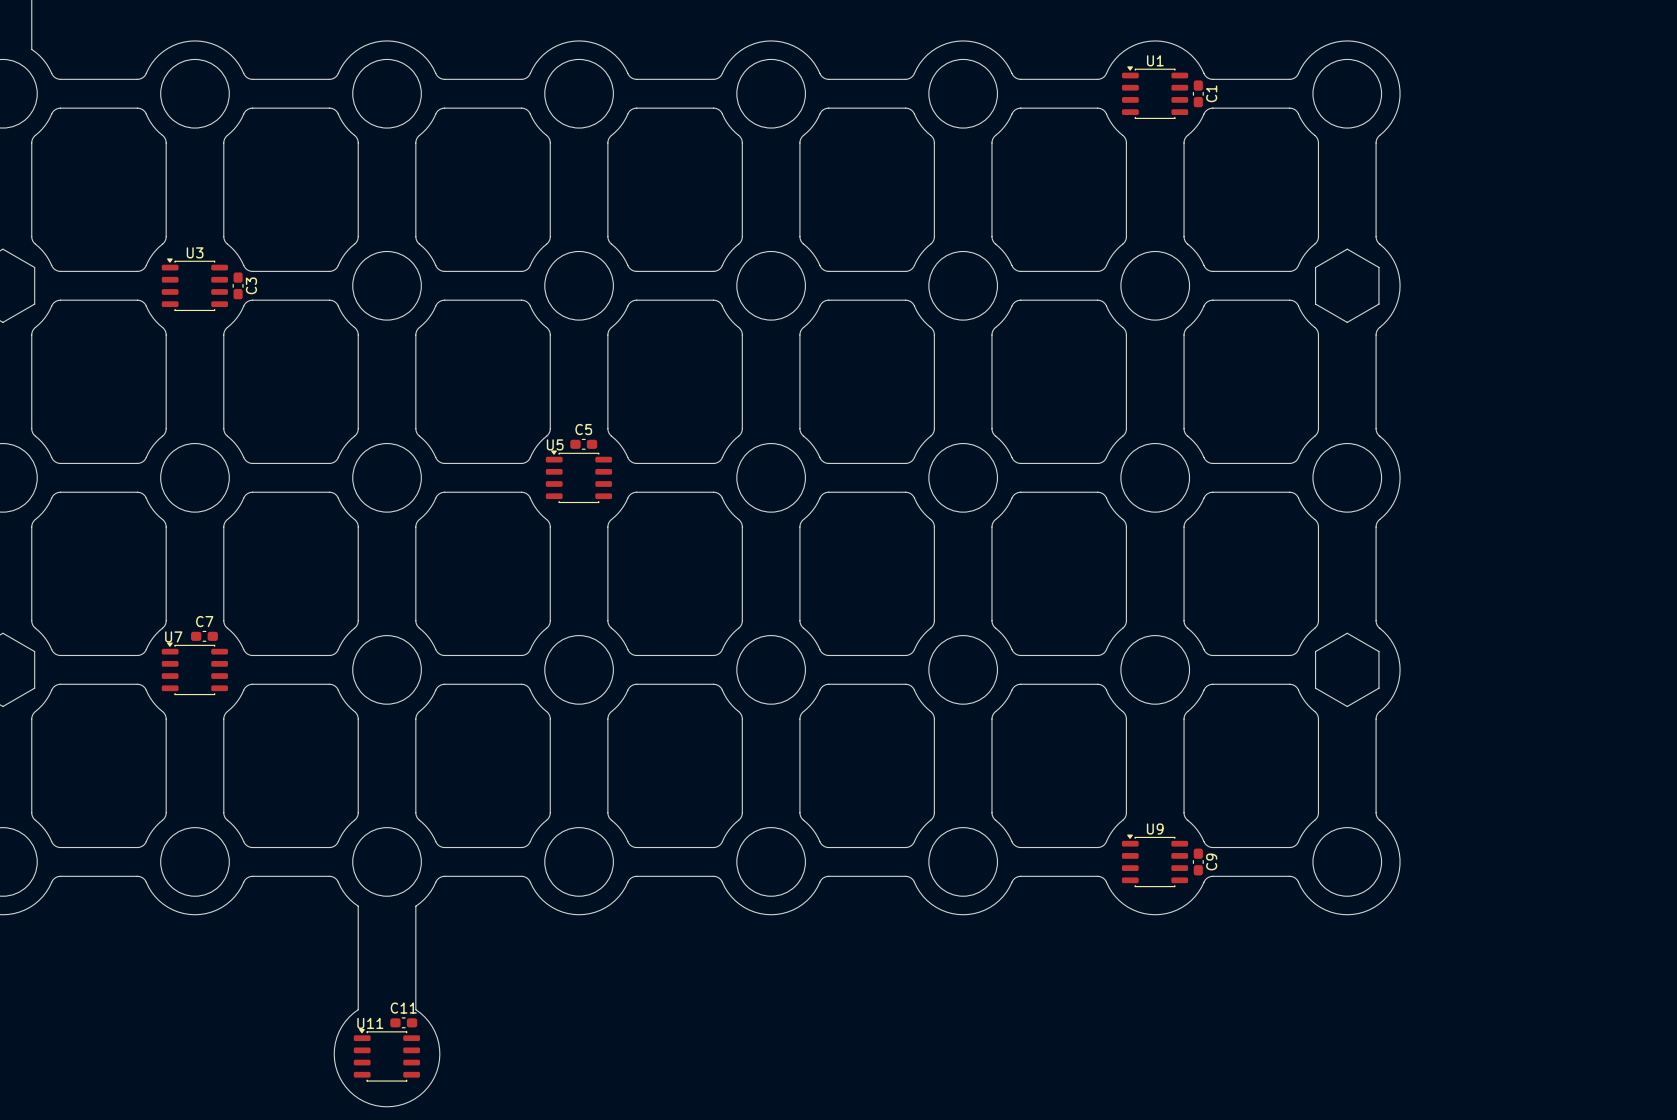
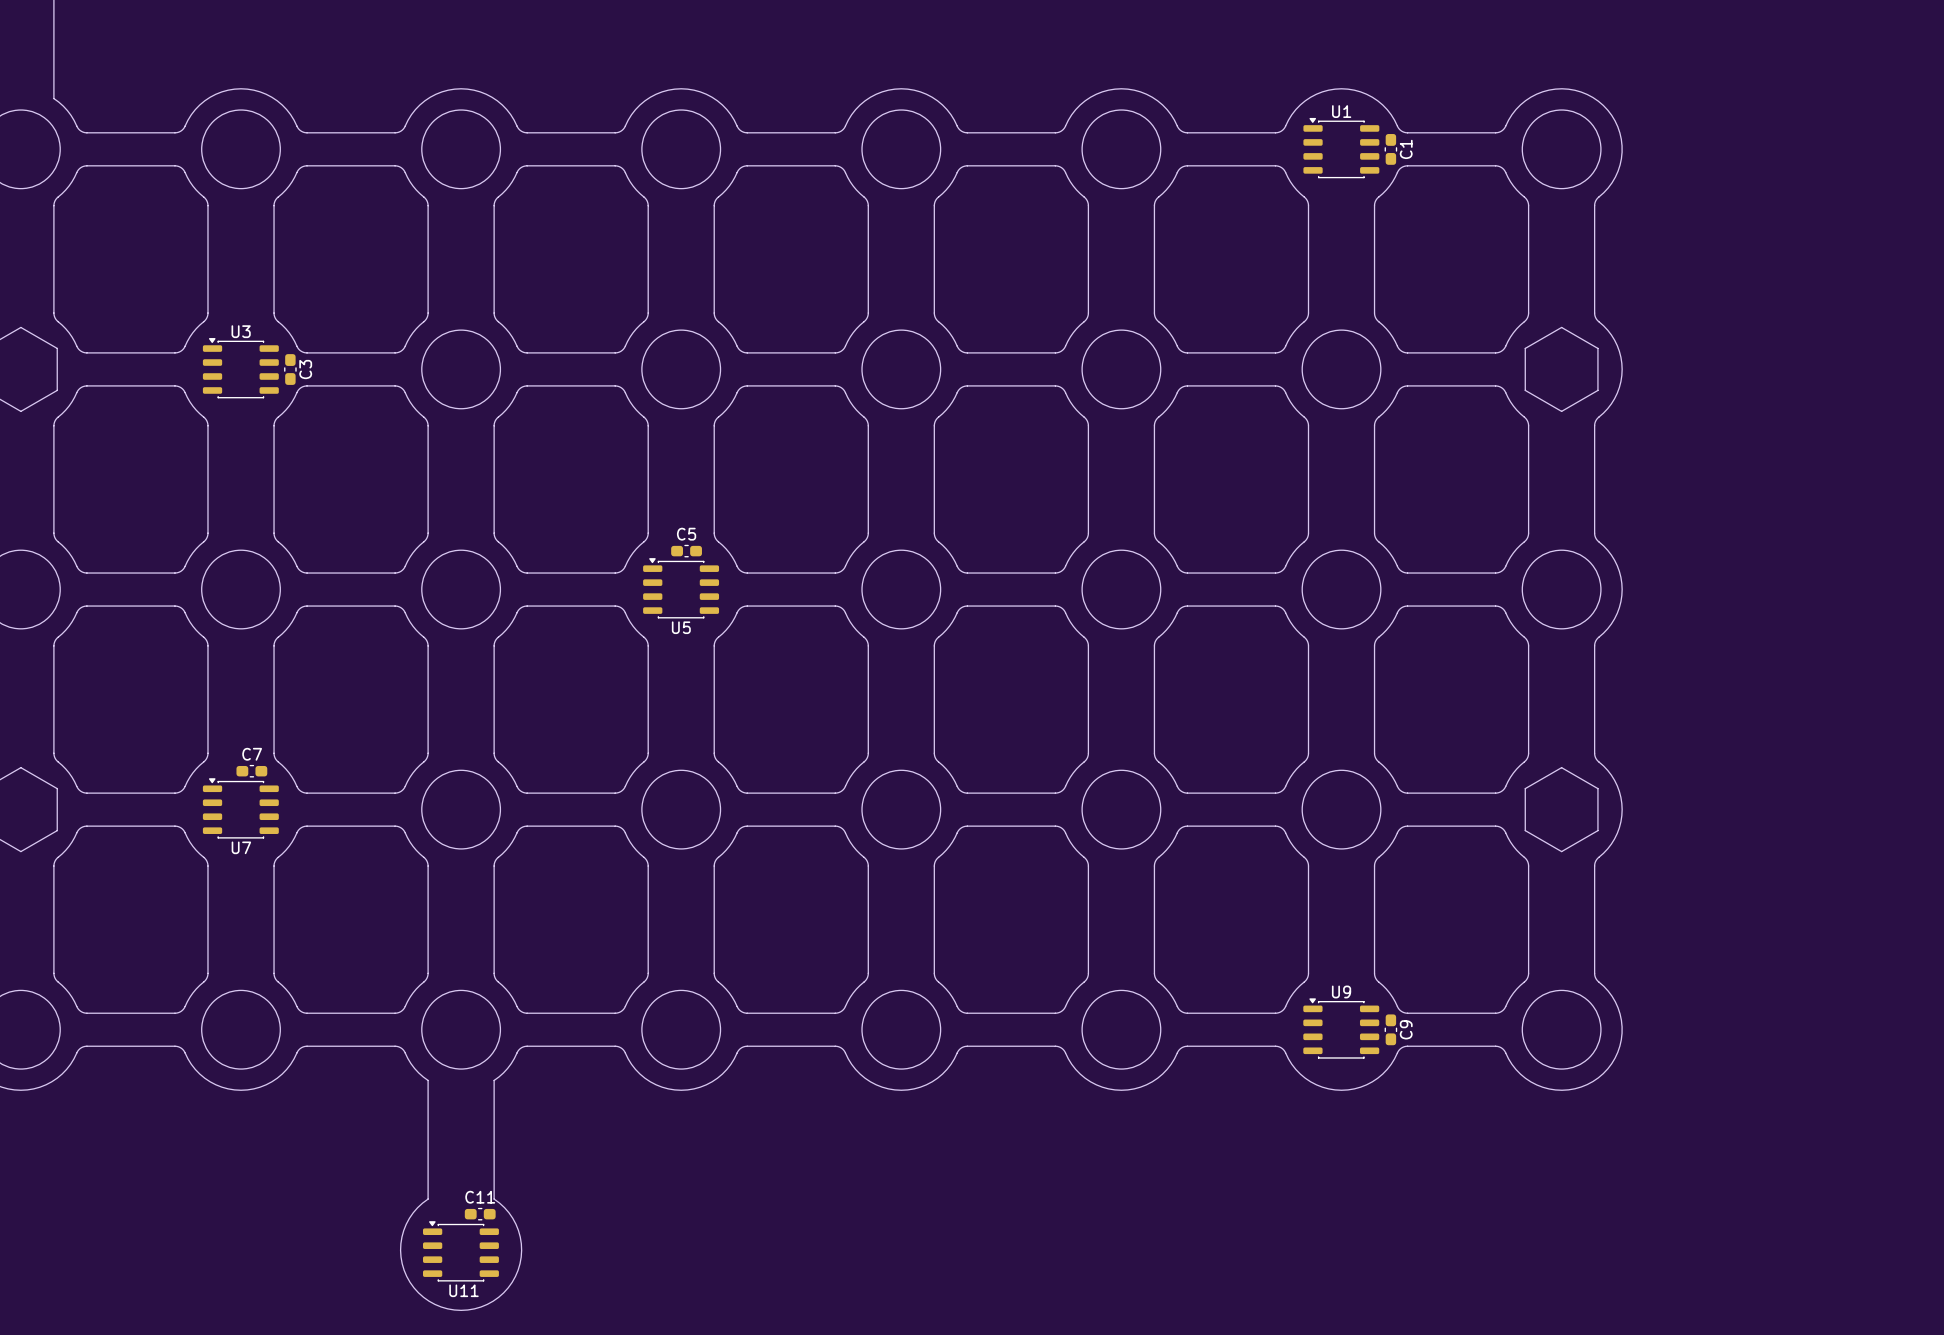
U5 name position: U5 (555, 444) -> U5 (681, 627)
U7 name position: U7 (173, 636) -> U7 (241, 847)
U11 name position: U11 (370, 1023) -> U11 (463, 1290)

